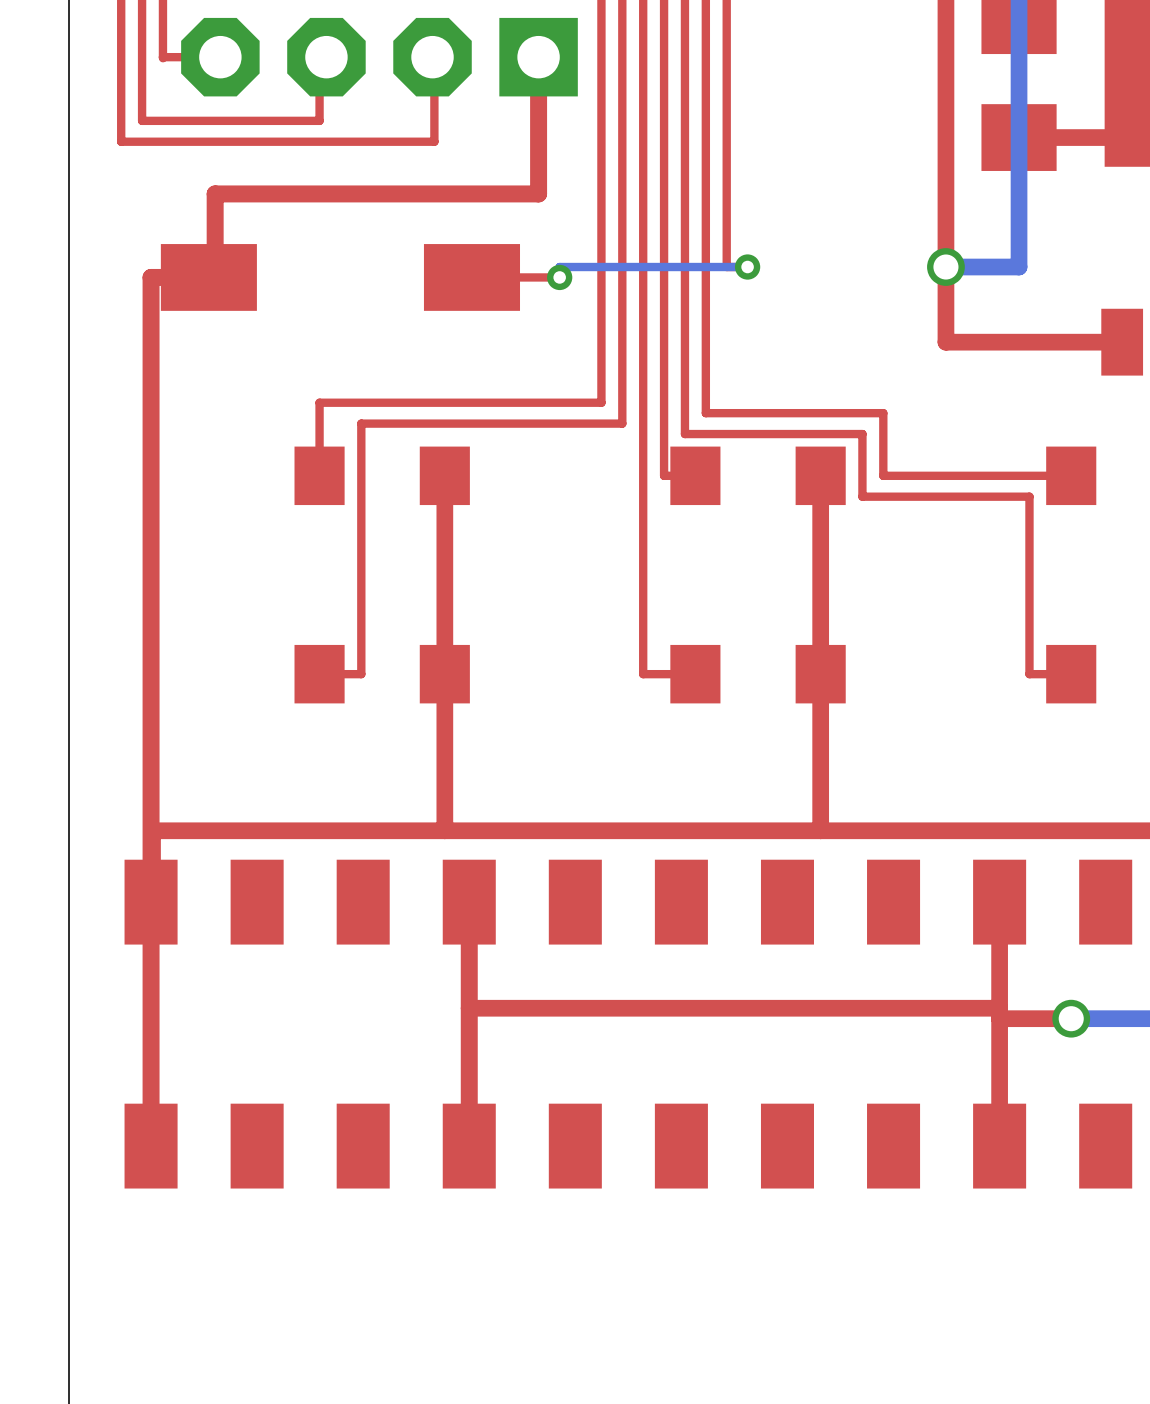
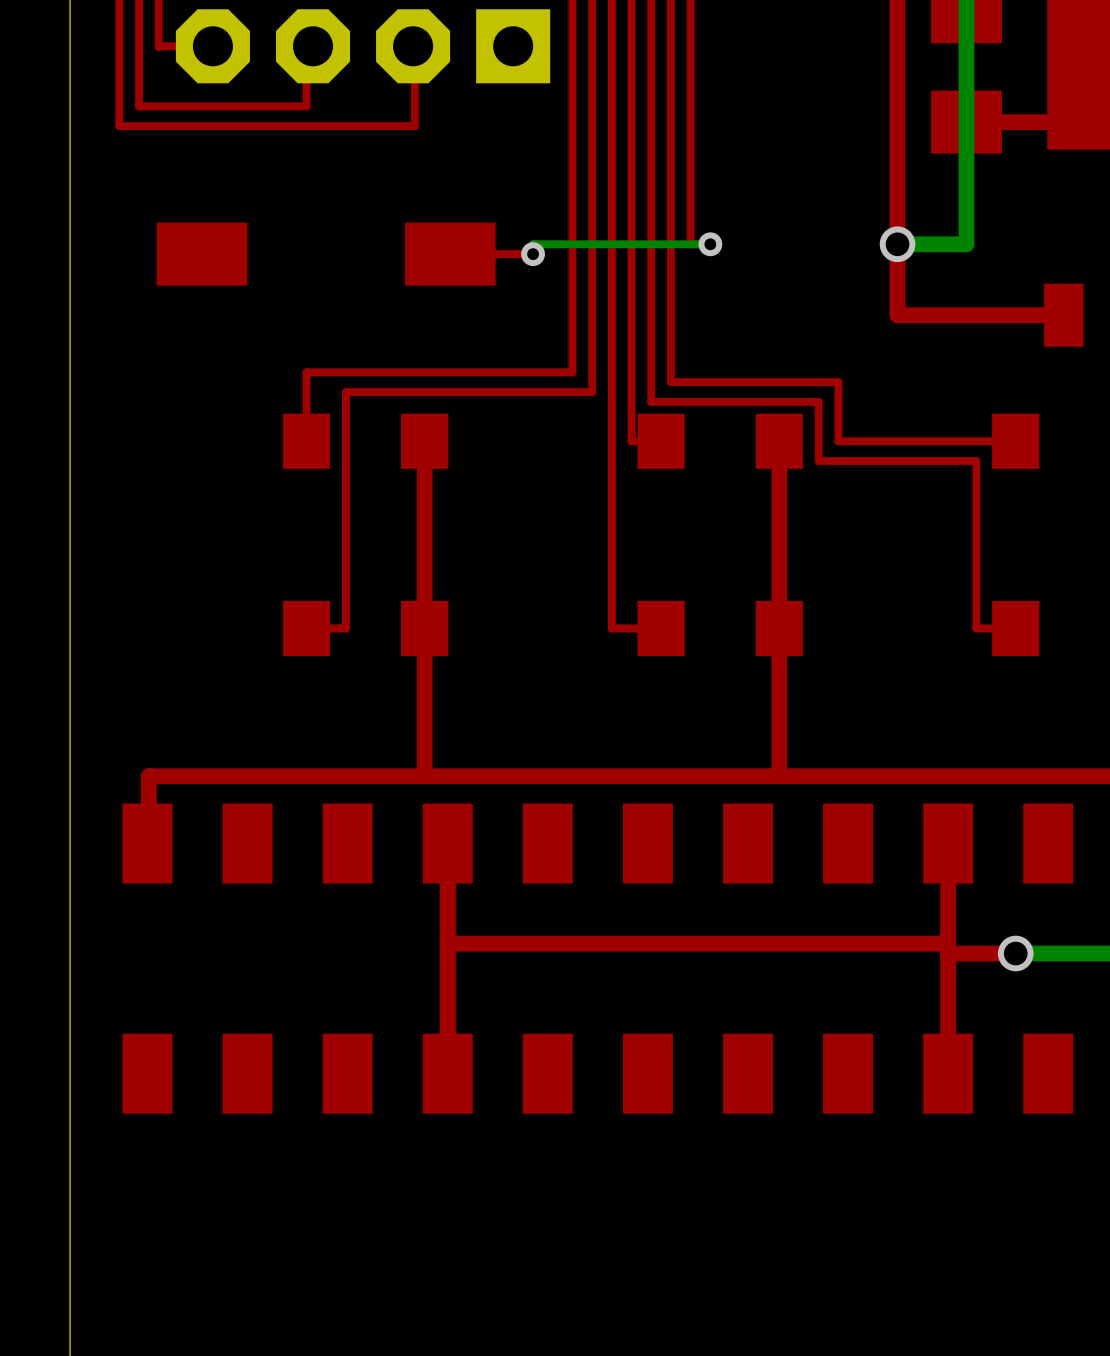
top track: (538, 57) (538, 193) (215, 193) (215, 277) (151, 277) (151, 1146) -> none

